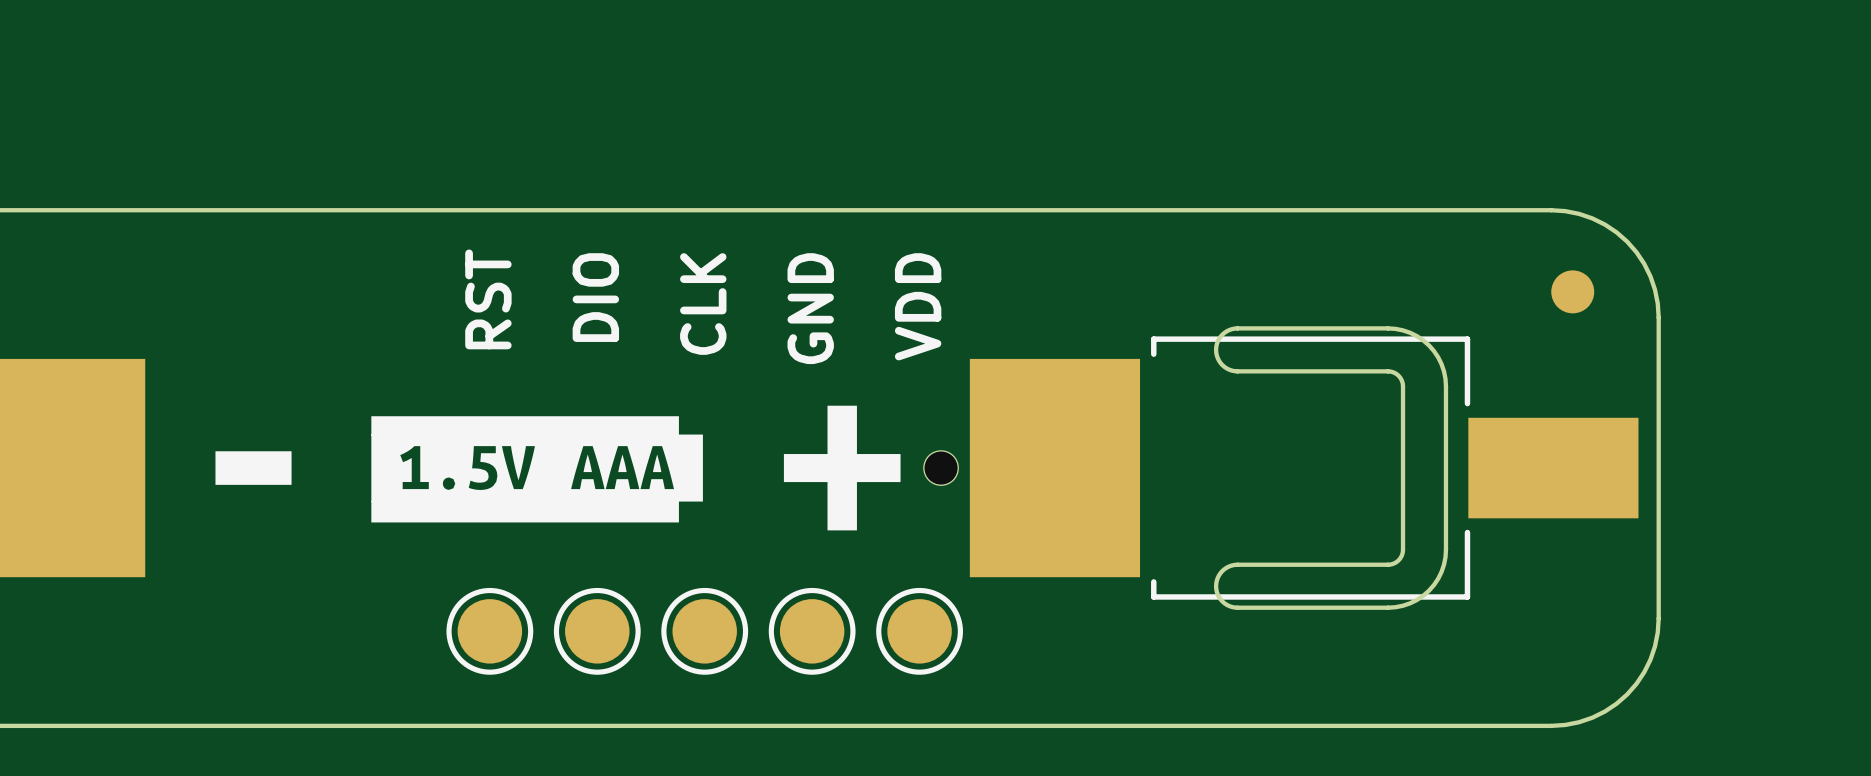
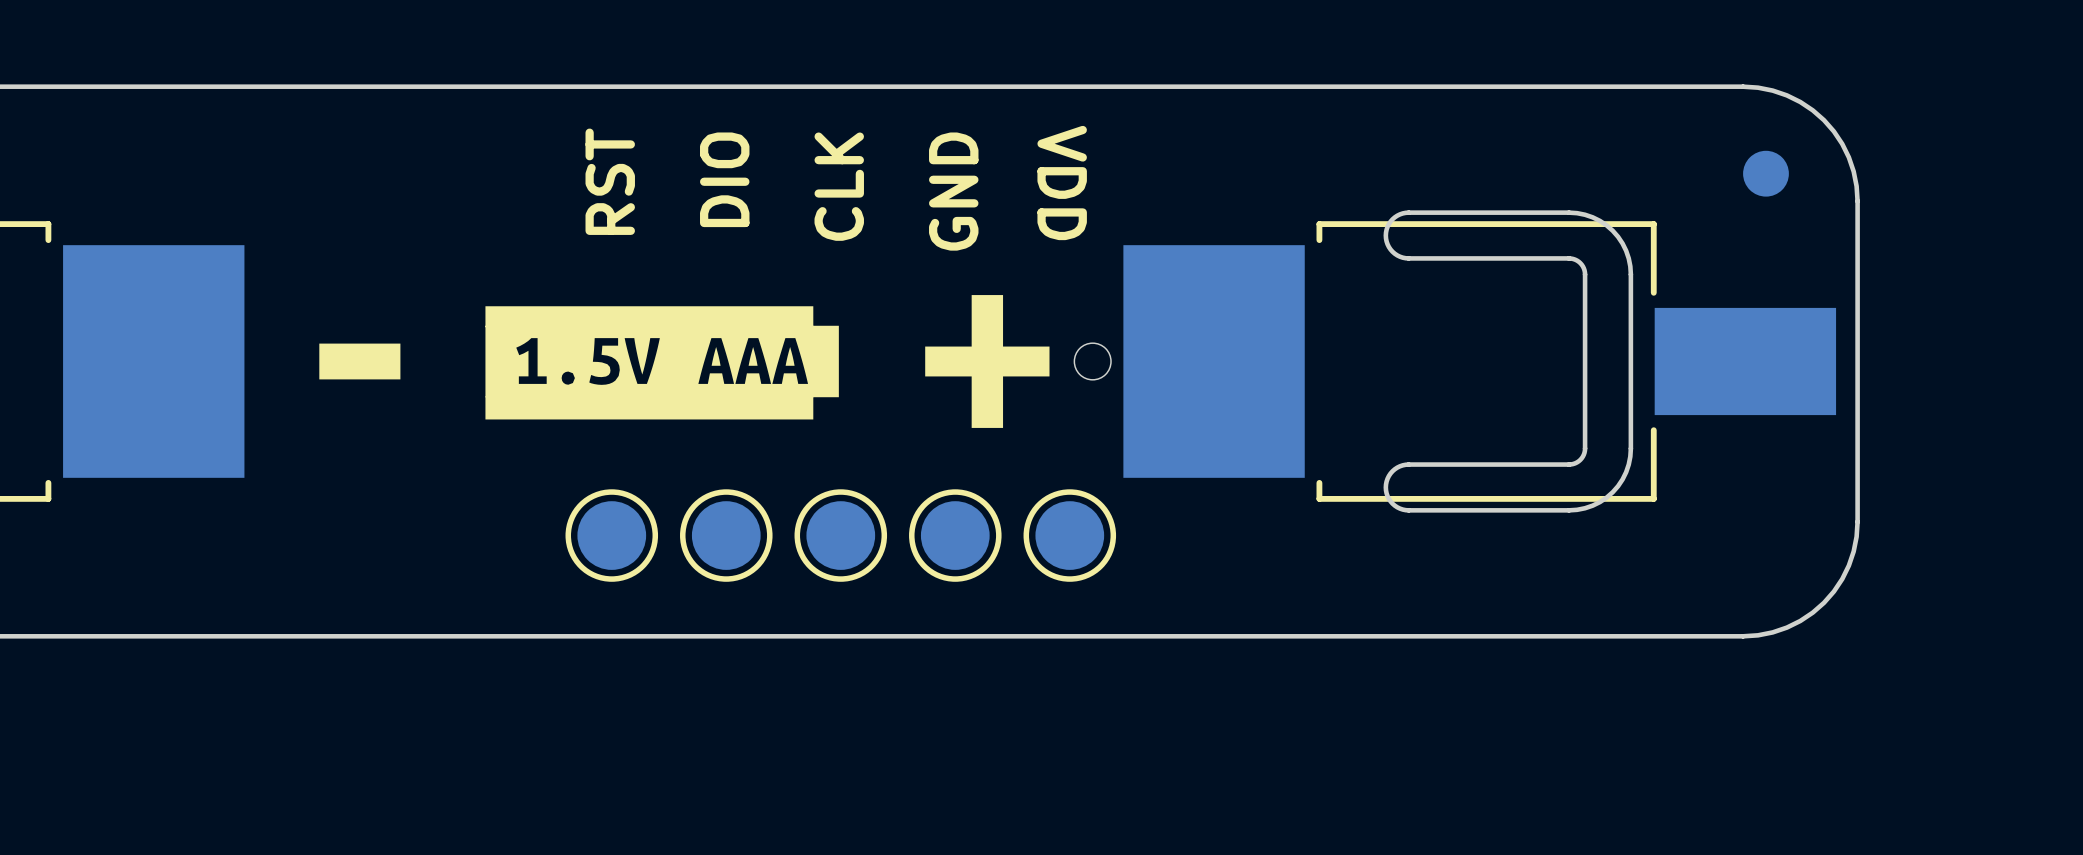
text rotation: 0° (918, 306) -> 180° (1062, 183)

